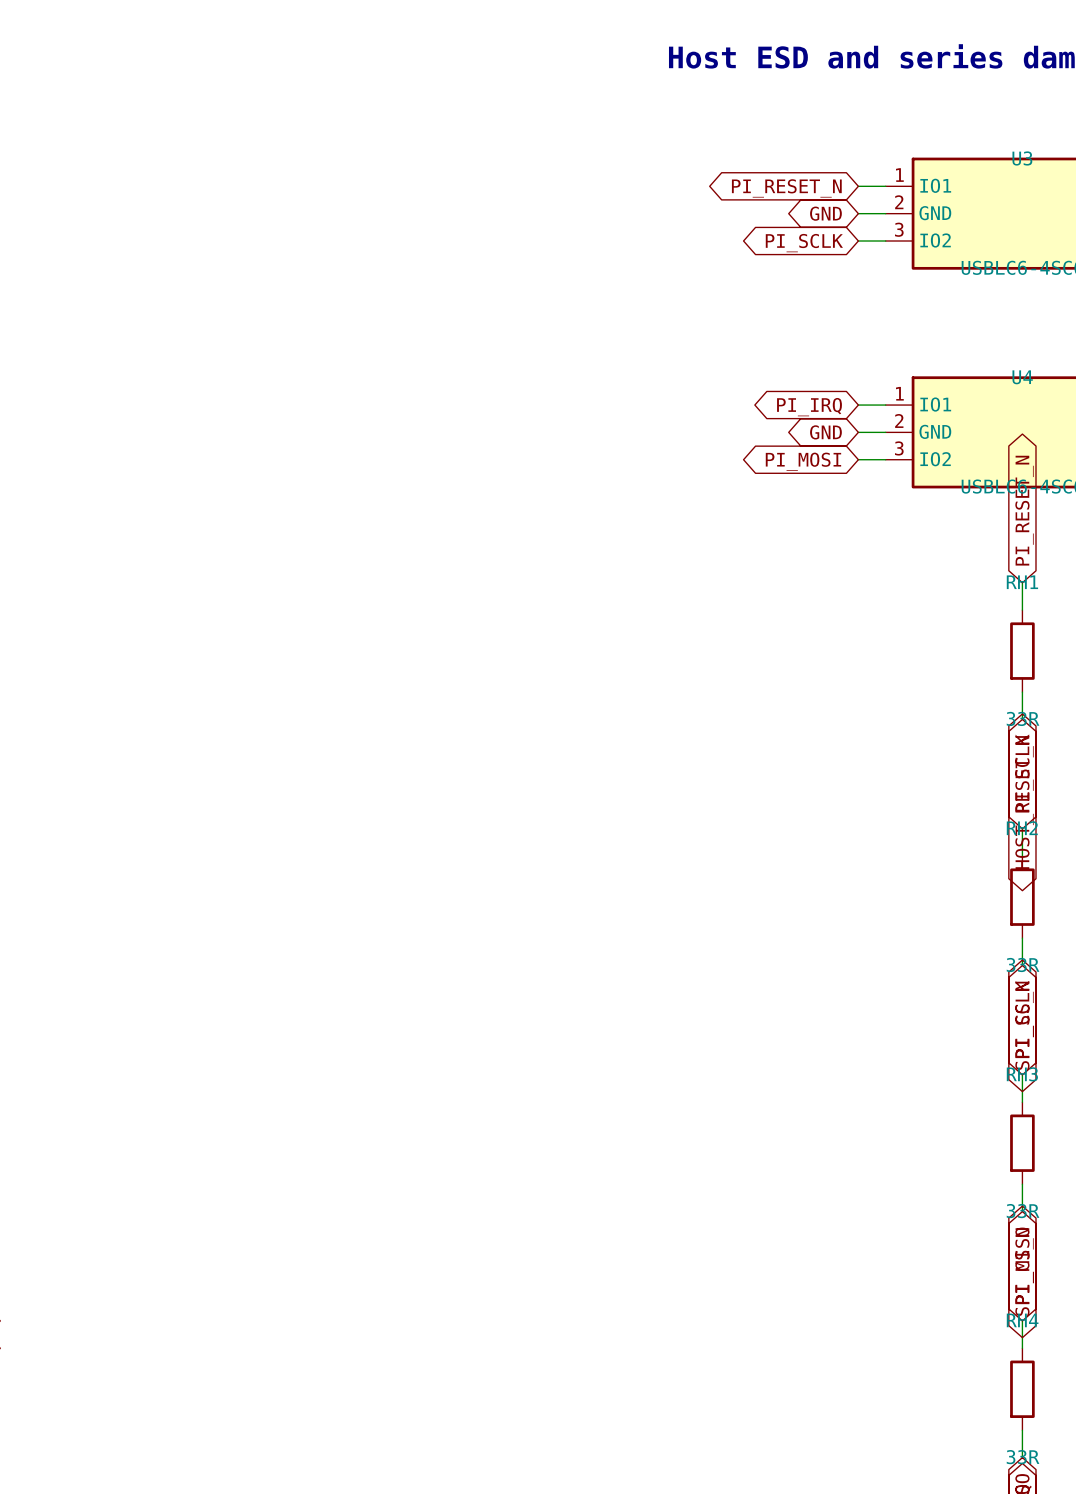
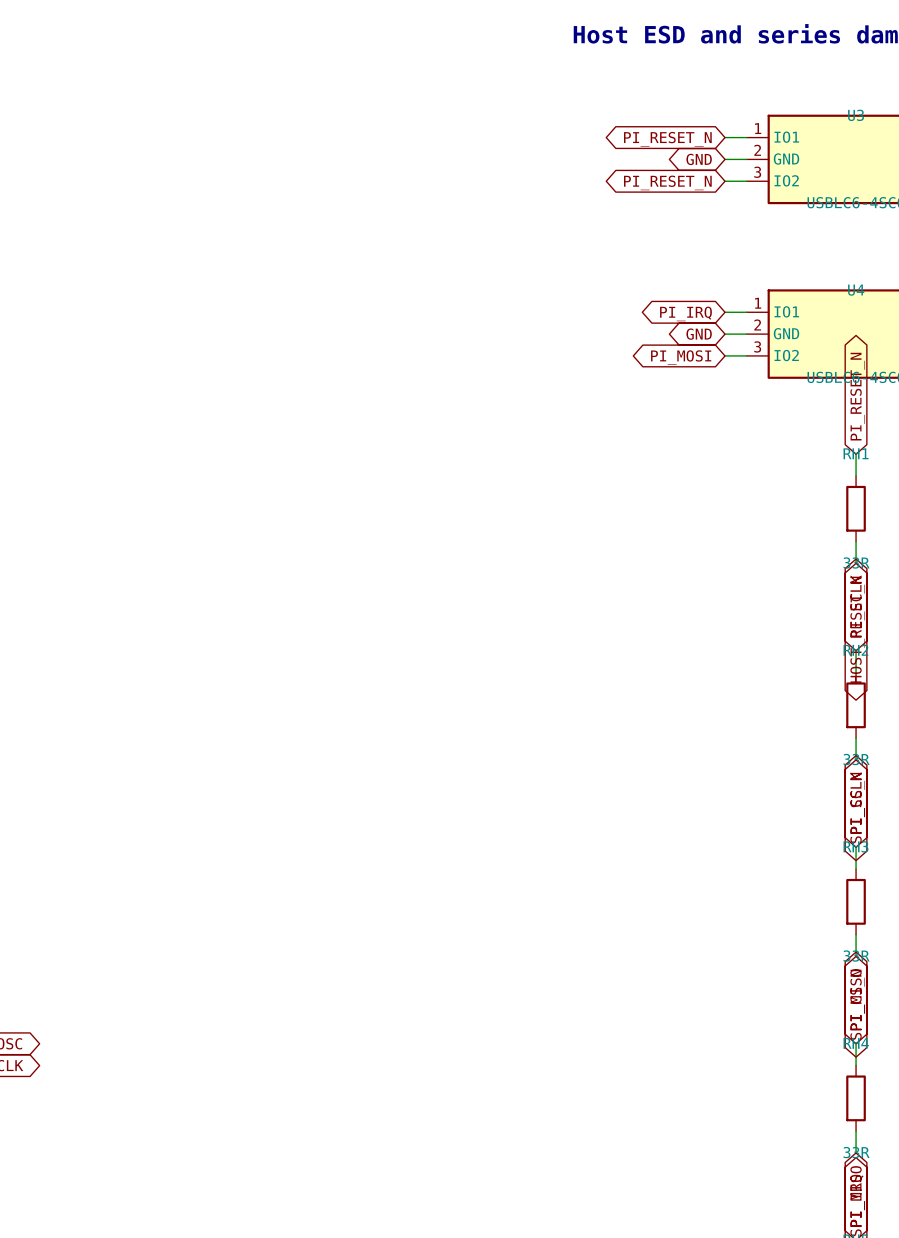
global label: PI_SCLK (804, 243) -> PI_RESET_N (667, 182)

